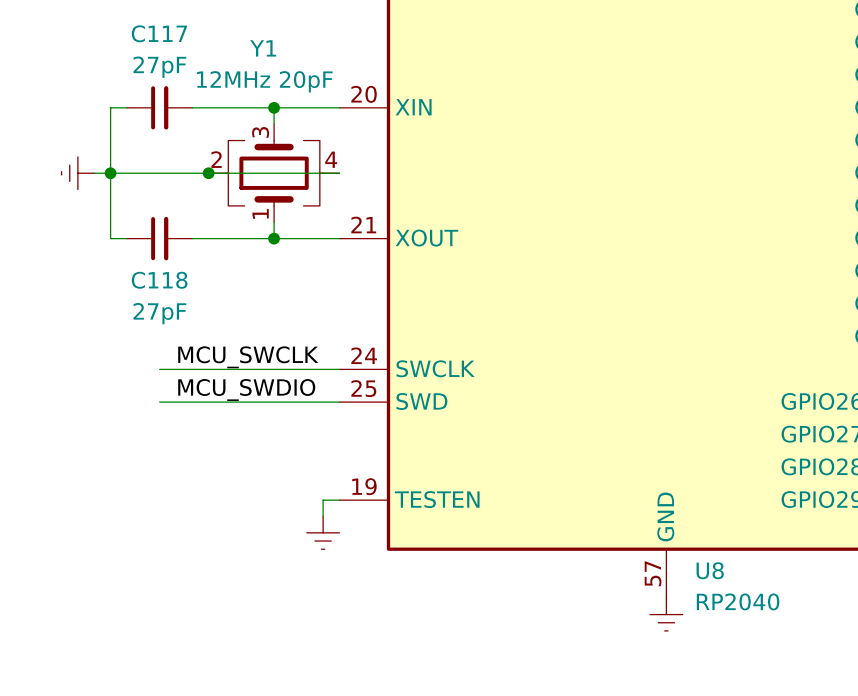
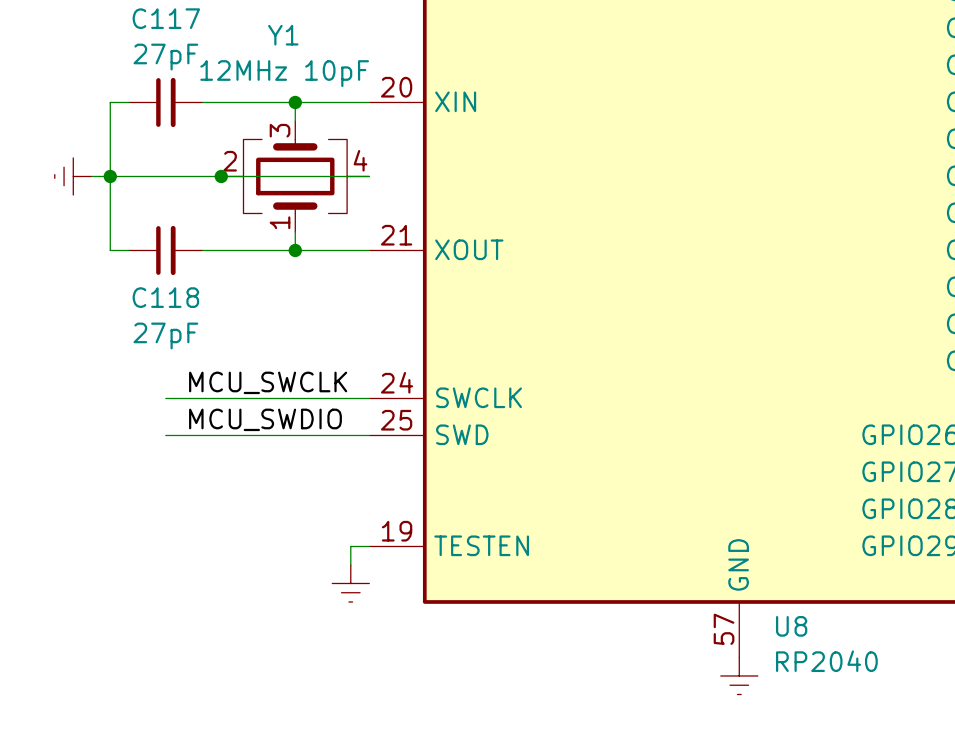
Y1 value: 12MHz 20pF (264, 81) -> 12MHz 10pF (284, 73)

